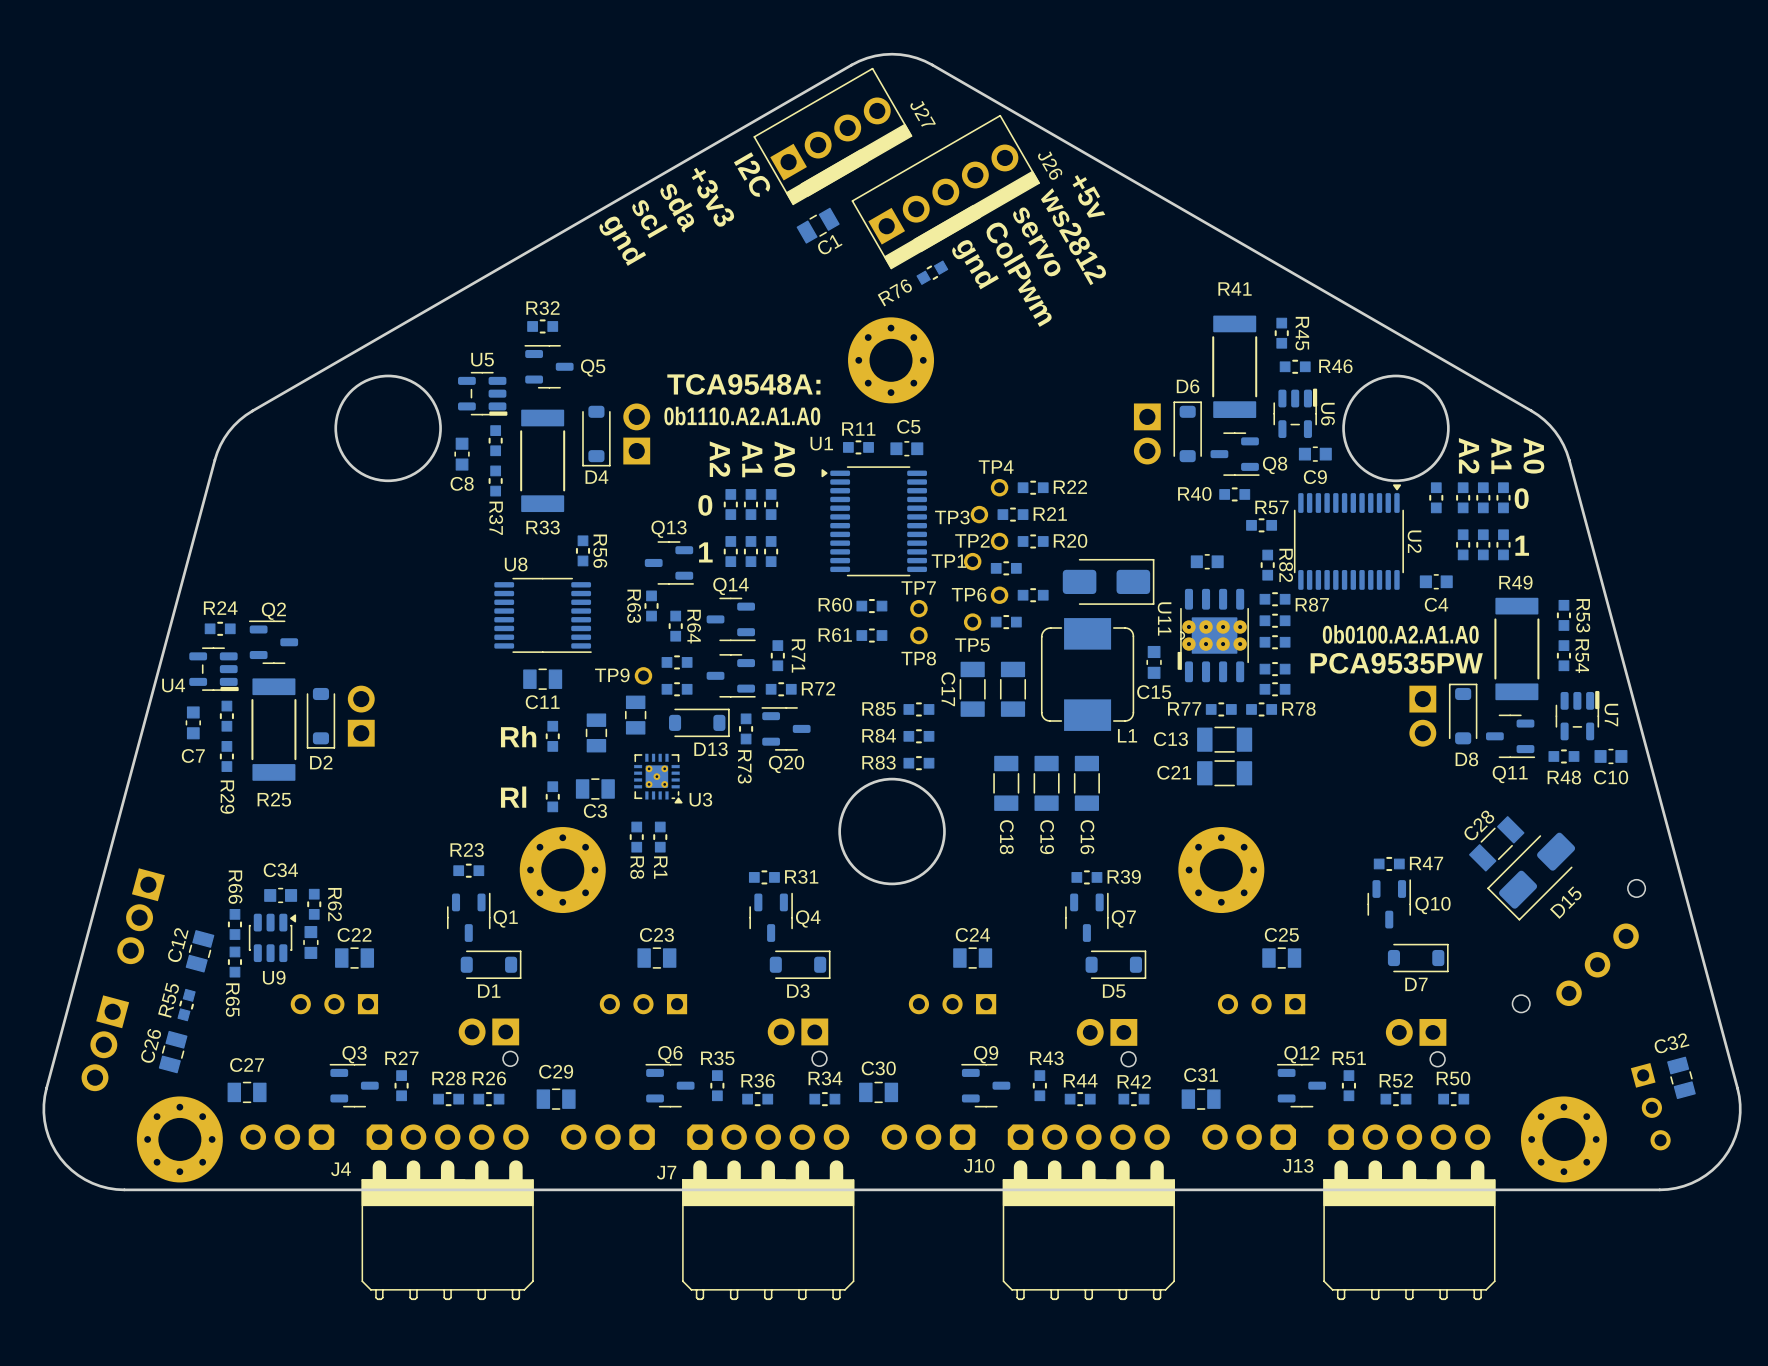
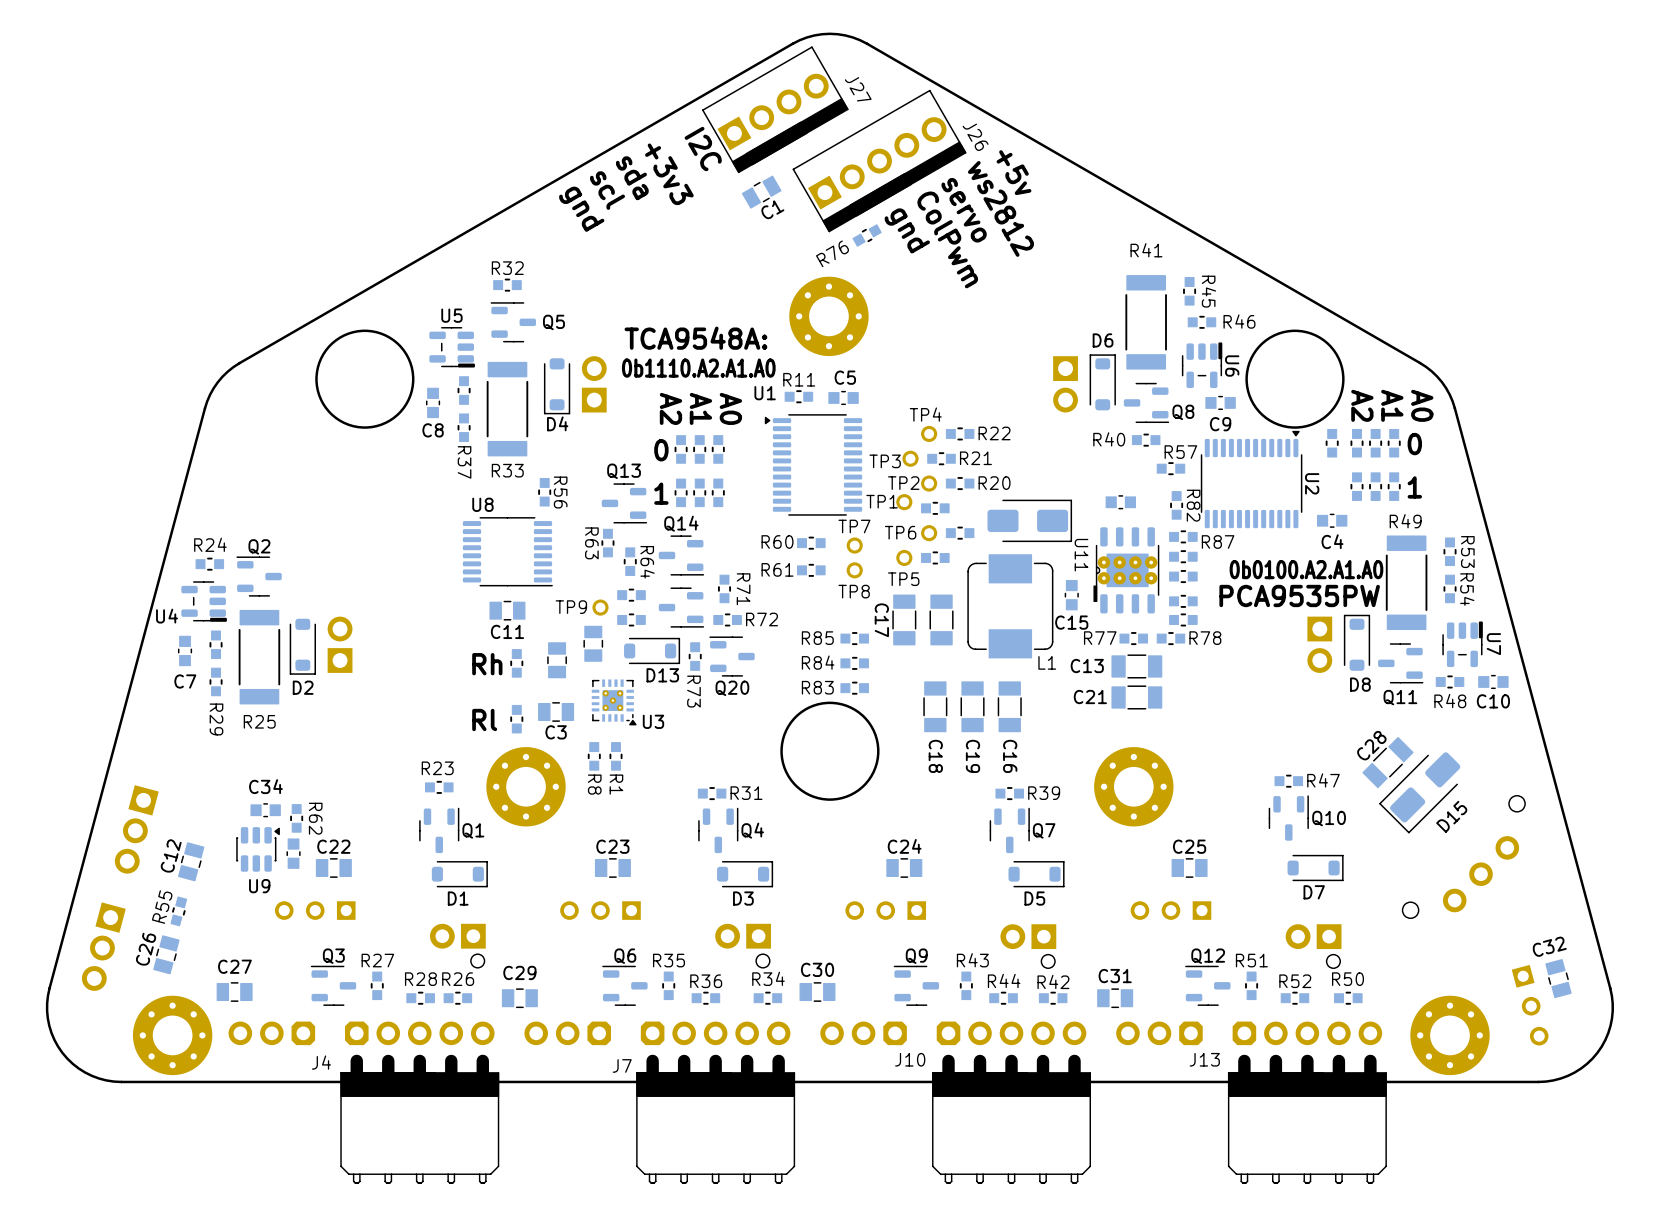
R66: (234, 924) -> none
R65: (234, 962) -> none

